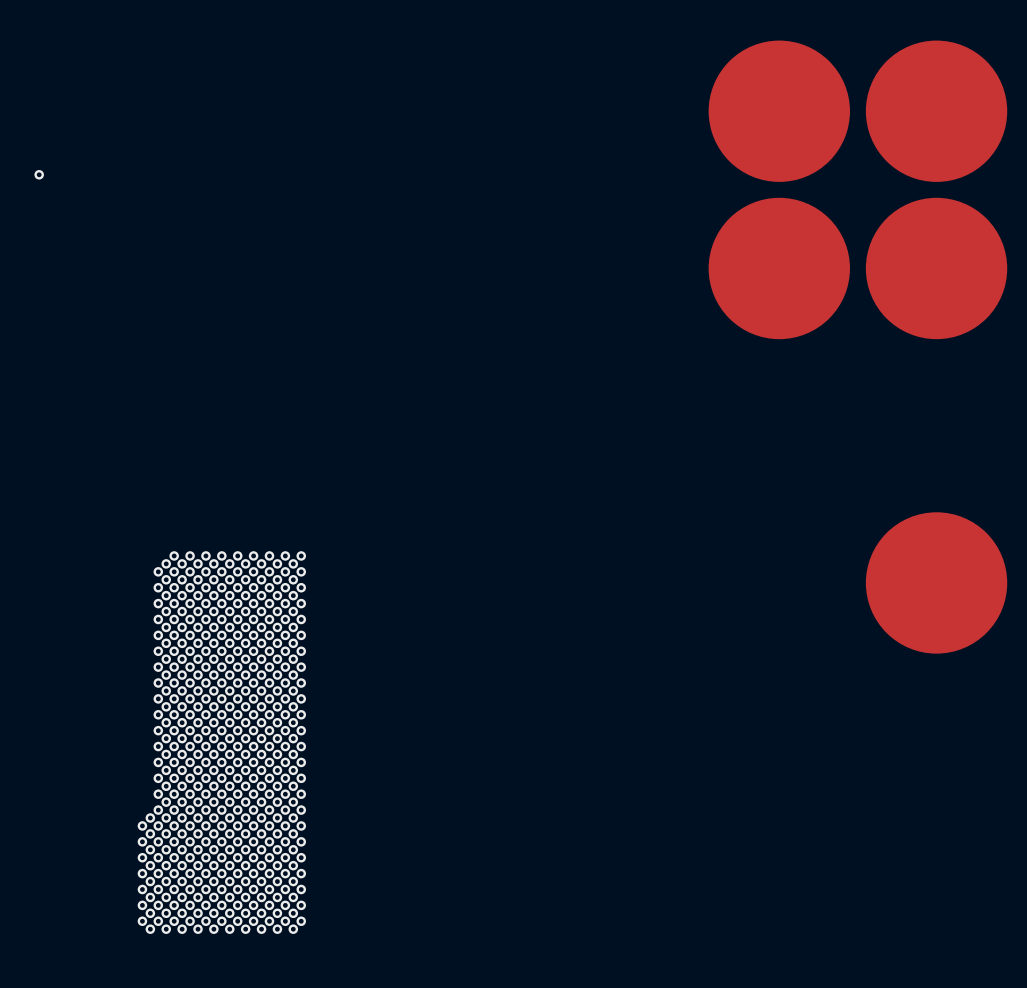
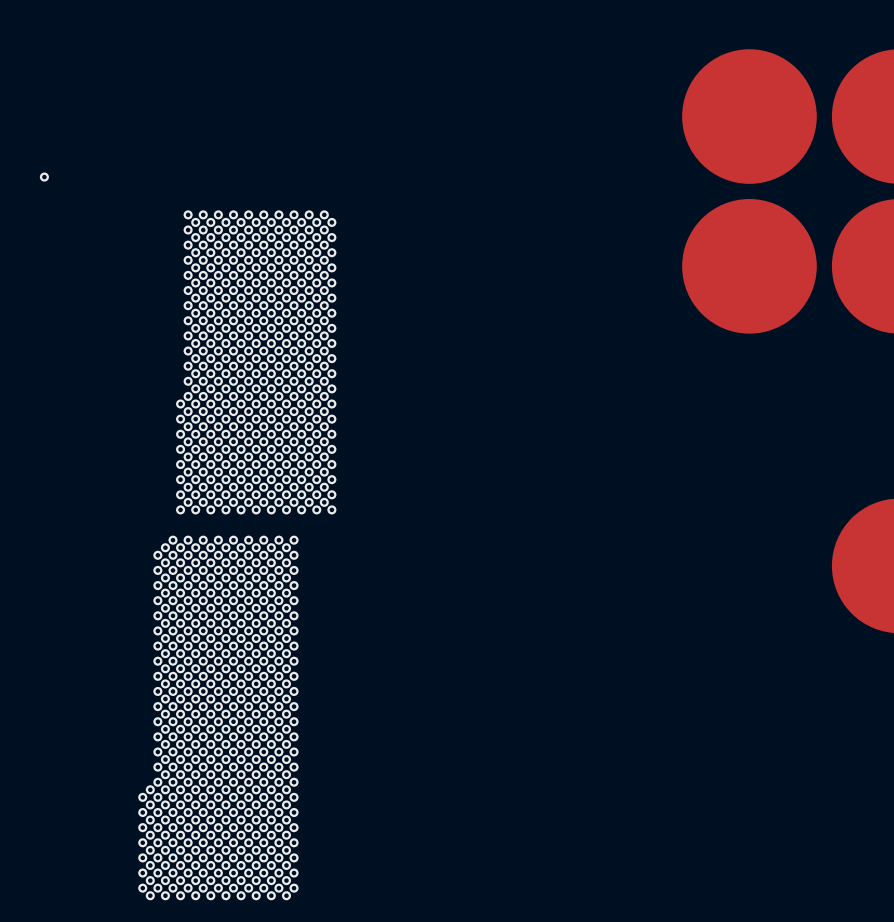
via: none -> (188, 214)
via: none -> (203, 214)
via: none -> (218, 214)
via: none -> (233, 214)
via: none -> (248, 214)
via: none -> (263, 214)
via: none -> (278, 214)
via: none -> (294, 214)
via: none -> (309, 214)
via: none -> (324, 214)
via: none -> (195, 222)
via: none -> (210, 222)
via: none -> (225, 222)
via: none -> (241, 222)
via: none -> (256, 222)
via: none -> (271, 222)
via: none -> (286, 222)
via: none -> (301, 222)
via: none -> (316, 222)
via: none -> (331, 222)
via: none -> (188, 230)
via: none -> (203, 230)
via: none -> (218, 230)
via: none -> (233, 230)
via: none -> (248, 230)
via: none -> (263, 230)
via: none -> (278, 230)
via: none -> (294, 230)
via: none -> (309, 230)
via: none -> (324, 230)
via: none -> (195, 237)
via: none -> (210, 237)
via: none -> (225, 237)
via: none -> (241, 237)
via: none -> (256, 237)
via: none -> (271, 237)
via: none -> (286, 237)
via: none -> (301, 237)
via: none -> (316, 237)
via: none -> (331, 237)
via: none -> (188, 245)
via: none -> (203, 245)
via: none -> (218, 245)
via: none -> (233, 245)
via: none -> (248, 245)
via: none -> (263, 245)
via: none -> (278, 245)
via: none -> (294, 245)
via: none -> (309, 245)
via: none -> (324, 245)
via: none -> (195, 252)
via: none -> (210, 252)
via: none -> (225, 252)
via: none -> (241, 252)
via: none -> (256, 252)
via: none -> (271, 252)
via: none -> (286, 252)
via: none -> (301, 252)
via: none -> (316, 252)
via: none -> (331, 252)
via: none -> (188, 260)
via: none -> (203, 260)
via: none -> (218, 260)
via: none -> (233, 260)
via: none -> (248, 260)
via: none -> (263, 260)
via: none -> (278, 260)
via: none -> (294, 260)
via: none -> (309, 260)
via: none -> (324, 260)
via: none -> (195, 267)
via: none -> (210, 267)
via: none -> (225, 267)
via: none -> (241, 267)
via: none -> (256, 267)
via: none -> (271, 267)
via: none -> (286, 267)
via: none -> (301, 267)
via: none -> (316, 267)
via: none -> (331, 267)
via: none -> (188, 275)
via: none -> (203, 275)
via: none -> (218, 275)
via: none -> (233, 275)
via: none -> (248, 275)
via: none -> (263, 275)
via: none -> (278, 275)
via: none -> (294, 275)
via: none -> (309, 275)
via: none -> (324, 275)
via: none -> (195, 282)
via: none -> (210, 282)
via: none -> (225, 282)
via: none -> (241, 282)
via: none -> (256, 282)
via: none -> (271, 282)
via: none -> (286, 282)
via: none -> (301, 282)
via: none -> (316, 282)
via: none -> (331, 282)
via: none -> (188, 290)
via: none -> (203, 290)
via: none -> (218, 290)
via: none -> (233, 290)
via: none -> (248, 290)
via: none -> (263, 290)
via: none -> (278, 290)
via: none -> (294, 290)
via: none -> (309, 290)
via: none -> (324, 290)
via: none -> (195, 298)
via: none -> (210, 298)
via: none -> (225, 298)
via: none -> (241, 298)
via: none -> (256, 298)
via: none -> (271, 298)
via: none -> (286, 298)
via: none -> (301, 298)
via: none -> (316, 298)
via: none -> (331, 298)
via: none -> (188, 305)
via: none -> (203, 305)
via: none -> (218, 305)
via: none -> (233, 305)
via: none -> (248, 305)
via: none -> (263, 305)
via: none -> (278, 305)
via: none -> (294, 305)
via: none -> (309, 305)
via: none -> (324, 305)
via: none -> (195, 313)
via: none -> (210, 313)
via: none -> (225, 313)
via: none -> (241, 313)
via: none -> (256, 313)
via: none -> (271, 313)
via: none -> (286, 313)
via: none -> (301, 313)
via: none -> (316, 313)
via: none -> (331, 313)
via: none -> (188, 320)
via: none -> (203, 320)
via: none -> (218, 320)
via: none -> (233, 320)
via: none -> (248, 320)
via: none -> (263, 320)
via: none -> (278, 320)
via: none -> (294, 320)
via: none -> (309, 320)
via: none -> (324, 320)
via: none -> (195, 328)
via: none -> (210, 328)
via: none -> (225, 328)
via: none -> (241, 328)
via: none -> (256, 328)
via: none -> (271, 328)
via: none -> (286, 328)
via: none -> (301, 328)
via: none -> (316, 328)
via: none -> (331, 328)
via: none -> (188, 335)
via: none -> (203, 335)
via: none -> (218, 335)
via: none -> (233, 335)
via: none -> (248, 335)
via: none -> (263, 335)
via: none -> (278, 335)
via: none -> (294, 335)
via: none -> (309, 335)
via: none -> (324, 335)
via: none -> (195, 343)
via: none -> (210, 343)
via: none -> (225, 343)
via: none -> (241, 343)
via: none -> (256, 343)
via: none -> (271, 343)
via: none -> (286, 343)
via: none -> (301, 343)
via: none -> (316, 343)
via: none -> (331, 343)
via: none -> (188, 351)
via: none -> (203, 351)
via: none -> (218, 351)
via: none -> (233, 351)
via: none -> (248, 351)
via: none -> (263, 351)
via: none -> (278, 351)
via: none -> (294, 351)
via: none -> (309, 351)
via: none -> (324, 351)
via: none -> (195, 358)
via: none -> (210, 358)
via: none -> (225, 358)
via: none -> (241, 358)
via: none -> (256, 358)
via: none -> (271, 358)
via: none -> (286, 358)
via: none -> (301, 358)
via: none -> (316, 358)
via: none -> (331, 358)
via: none -> (188, 366)
via: none -> (203, 366)
via: none -> (218, 366)
via: none -> (233, 366)
via: none -> (248, 366)
via: none -> (263, 366)
via: none -> (278, 366)
via: none -> (294, 366)
via: none -> (309, 366)
via: none -> (324, 366)
via: none -> (195, 373)
via: none -> (210, 373)
via: none -> (225, 373)
via: none -> (241, 373)
via: none -> (256, 373)
via: none -> (271, 373)
via: none -> (286, 373)
via: none -> (301, 373)
via: none -> (316, 373)
via: none -> (331, 373)
via: none -> (188, 381)
via: none -> (203, 381)
via: none -> (218, 381)
via: none -> (233, 381)
via: none -> (248, 381)
via: none -> (263, 381)
via: none -> (278, 381)
via: none -> (294, 381)
via: none -> (309, 381)
via: none -> (324, 381)
via: none -> (195, 388)
via: none -> (210, 388)
via: none -> (225, 388)
via: none -> (241, 388)
via: none -> (256, 388)
via: none -> (271, 388)
via: none -> (286, 388)
via: none -> (301, 388)
via: none -> (316, 388)
via: none -> (331, 388)
via: none -> (188, 396)
via: none -> (203, 396)
via: none -> (218, 396)
via: none -> (233, 396)
via: none -> (248, 396)
via: none -> (263, 396)
via: none -> (278, 396)
via: none -> (294, 396)
via: none -> (309, 396)
via: none -> (324, 396)
via: none -> (180, 404)
via: none -> (195, 404)
via: none -> (210, 404)
via: none -> (225, 404)
via: none -> (241, 404)
via: none -> (256, 404)
via: none -> (271, 404)
via: none -> (286, 404)
via: none -> (301, 404)
via: none -> (316, 404)
via: none -> (331, 404)
via: none -> (188, 411)
via: none -> (203, 411)
via: none -> (218, 411)
via: none -> (233, 411)
via: none -> (248, 411)
via: none -> (263, 411)
via: none -> (278, 411)
via: none -> (294, 411)
via: none -> (309, 411)
via: none -> (324, 411)
via: none -> (180, 419)
via: none -> (195, 419)
via: none -> (210, 419)
via: none -> (225, 419)
via: none -> (241, 419)
via: none -> (256, 419)
via: none -> (271, 419)
via: none -> (286, 419)
via: none -> (301, 419)
via: none -> (316, 419)
via: none -> (331, 419)
via: none -> (188, 426)
via: none -> (203, 426)
via: none -> (218, 426)
via: none -> (233, 426)
via: none -> (248, 426)
via: none -> (263, 426)
via: none -> (278, 426)
via: none -> (294, 426)
via: none -> (309, 426)
via: none -> (324, 426)
via: none -> (180, 434)
via: none -> (195, 434)
via: none -> (210, 434)
via: none -> (225, 434)
via: none -> (241, 434)
via: none -> (256, 434)
via: none -> (271, 434)
via: none -> (286, 434)
via: none -> (301, 434)
via: none -> (316, 434)
via: none -> (331, 434)
via: none -> (188, 441)
via: none -> (203, 441)
via: none -> (218, 441)
via: none -> (233, 441)
via: none -> (248, 441)
via: none -> (263, 441)
via: none -> (278, 441)
via: none -> (294, 441)
via: none -> (309, 441)
via: none -> (324, 441)
via: none -> (180, 449)
via: none -> (195, 449)
via: none -> (210, 449)
via: none -> (225, 449)
via: none -> (241, 449)
via: none -> (256, 449)
via: none -> (271, 449)
via: none -> (286, 449)
via: none -> (301, 449)
via: none -> (316, 449)
via: none -> (331, 449)
via: none -> (188, 456)
via: none -> (203, 456)
via: none -> (218, 456)
via: none -> (233, 456)
via: none -> (248, 456)
via: none -> (263, 456)
via: none -> (278, 456)
via: none -> (294, 456)
via: none -> (309, 456)
via: none -> (324, 456)
via: none -> (180, 464)
via: none -> (195, 464)
via: none -> (210, 464)
via: none -> (225, 464)
via: none -> (241, 464)
via: none -> (256, 464)
via: none -> (271, 464)
via: none -> (286, 464)
via: none -> (301, 464)
via: none -> (316, 464)
via: none -> (331, 464)
via: none -> (188, 472)
via: none -> (203, 472)
via: none -> (218, 472)
via: none -> (233, 472)
via: none -> (248, 472)
via: none -> (263, 472)
via: none -> (278, 472)
via: none -> (294, 472)
via: none -> (309, 472)
via: none -> (324, 472)
via: none -> (180, 479)
via: none -> (195, 479)
via: none -> (210, 479)
via: none -> (225, 479)
via: none -> (241, 479)
via: none -> (256, 479)
via: none -> (271, 479)
via: none -> (286, 479)
via: none -> (301, 479)
via: none -> (316, 479)
via: none -> (331, 479)
via: none -> (188, 487)
via: none -> (203, 487)
via: none -> (218, 487)
via: none -> (233, 487)
via: none -> (248, 487)
via: none -> (263, 487)
via: none -> (278, 487)
via: none -> (294, 487)
via: none -> (309, 487)
via: none -> (324, 487)
via: none -> (180, 494)
via: none -> (195, 494)
via: none -> (210, 494)
via: none -> (225, 494)
via: none -> (241, 494)
via: none -> (256, 494)
via: none -> (271, 494)
via: none -> (286, 494)
via: none -> (301, 494)
via: none -> (316, 494)
via: none -> (331, 494)
via: none -> (188, 502)
via: none -> (203, 502)
via: none -> (218, 502)
via: none -> (233, 502)
via: none -> (248, 502)
via: none -> (263, 502)
via: none -> (278, 502)
via: none -> (294, 502)
via: none -> (309, 502)
via: none -> (324, 502)
via: none -> (180, 509)
via: none -> (195, 509)
via: none -> (210, 509)
via: none -> (225, 509)
via: none -> (241, 509)
via: none -> (256, 509)
via: none -> (271, 509)
via: none -> (286, 509)
via: none -> (301, 509)
via: none -> (316, 509)
via: none -> (331, 509)

